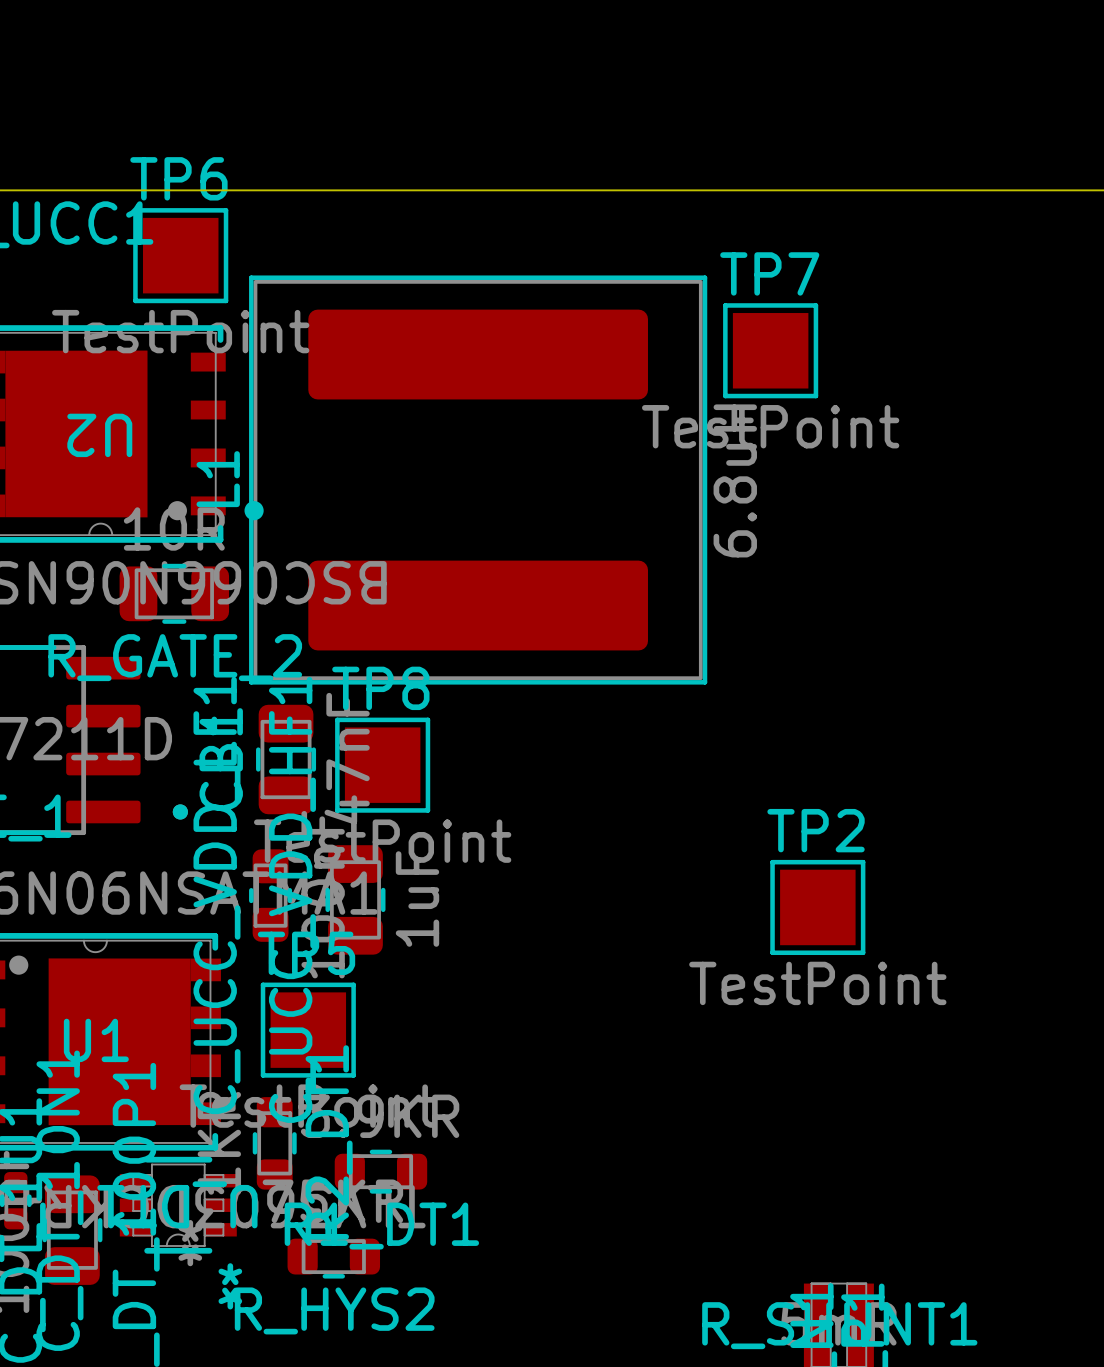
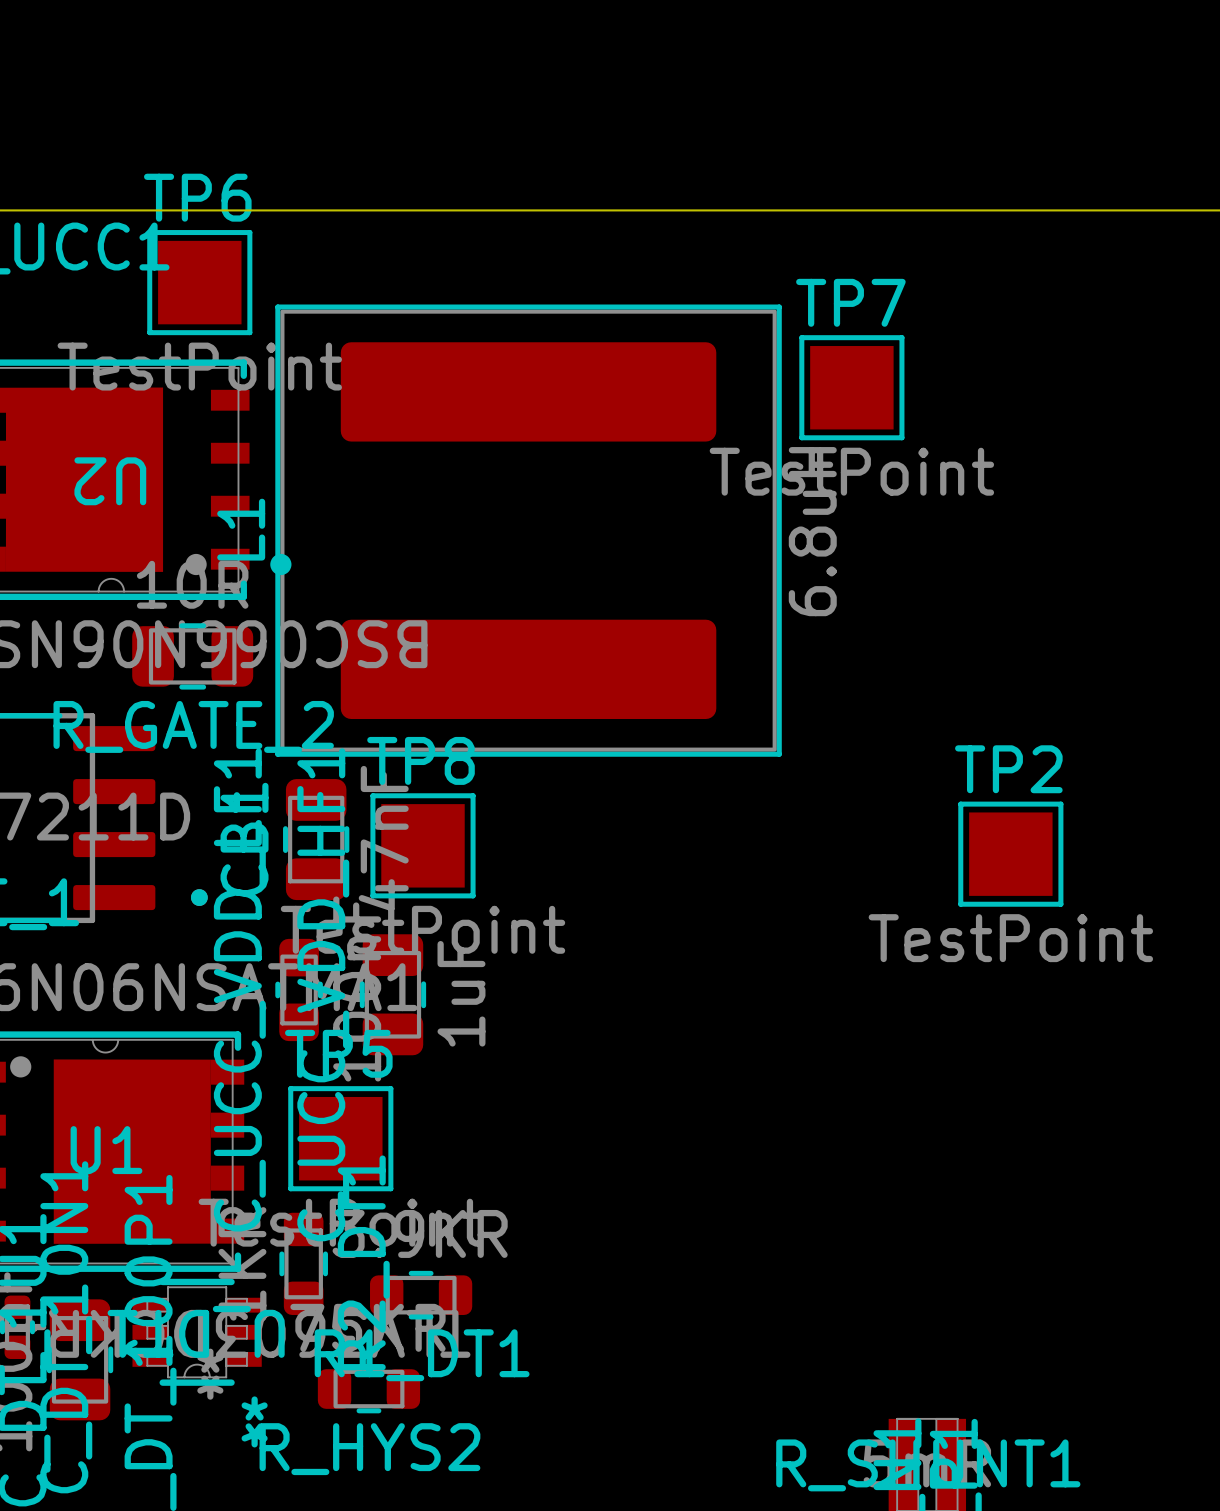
TP2 position: (817, 907) -> (1010, 854)

